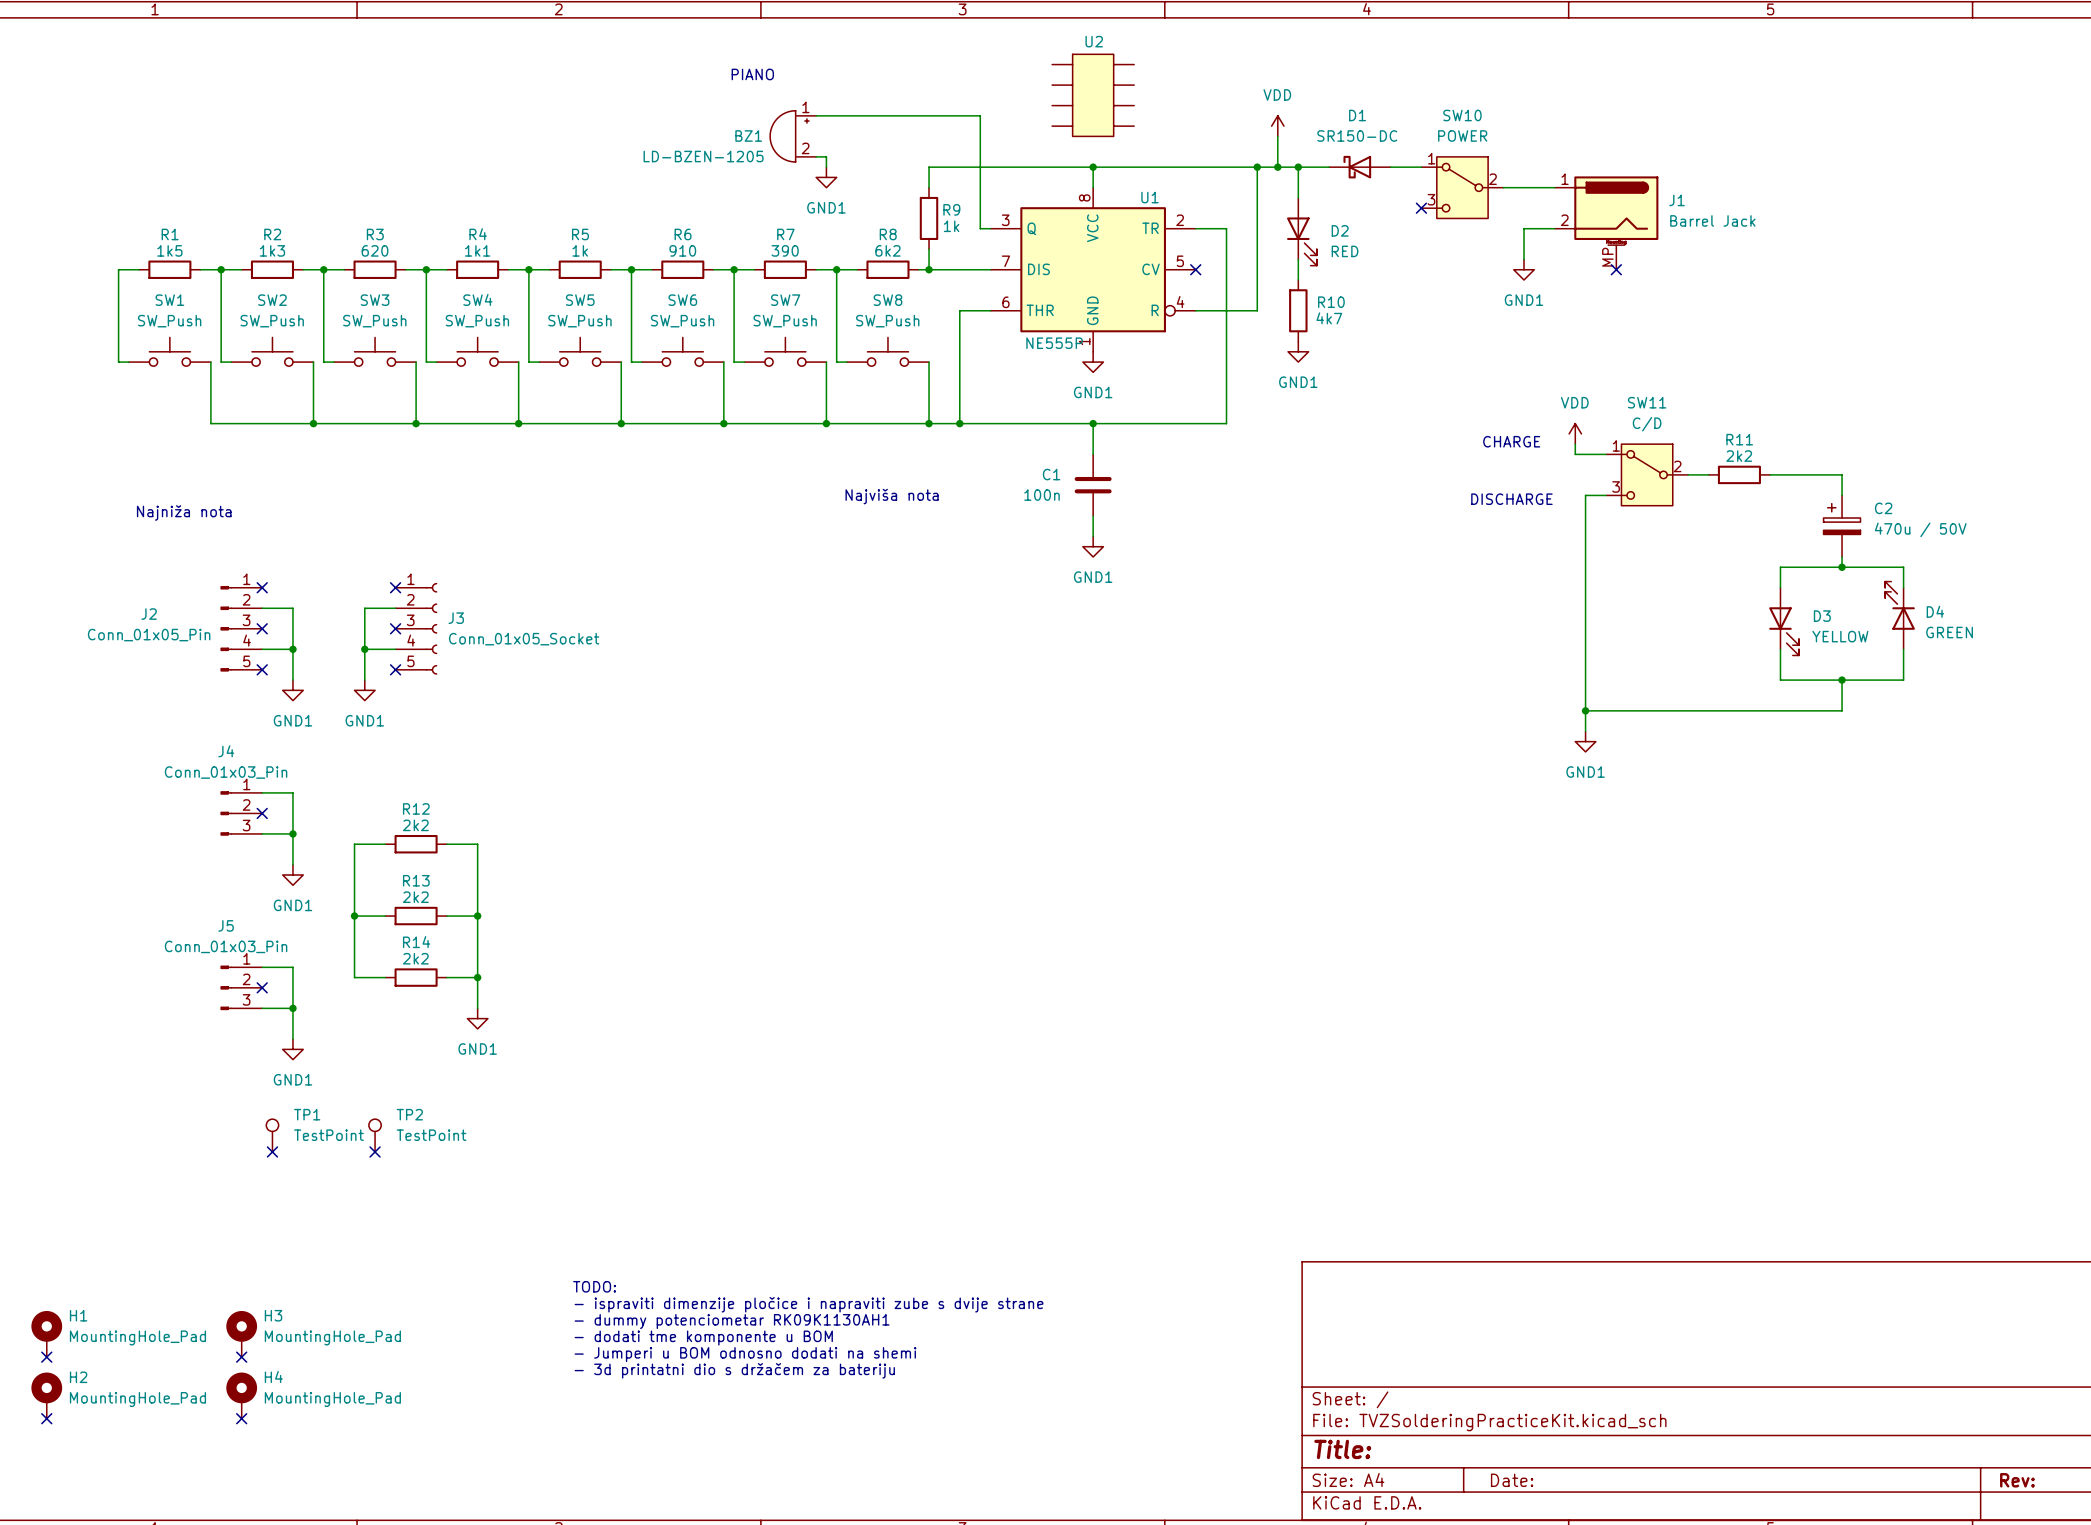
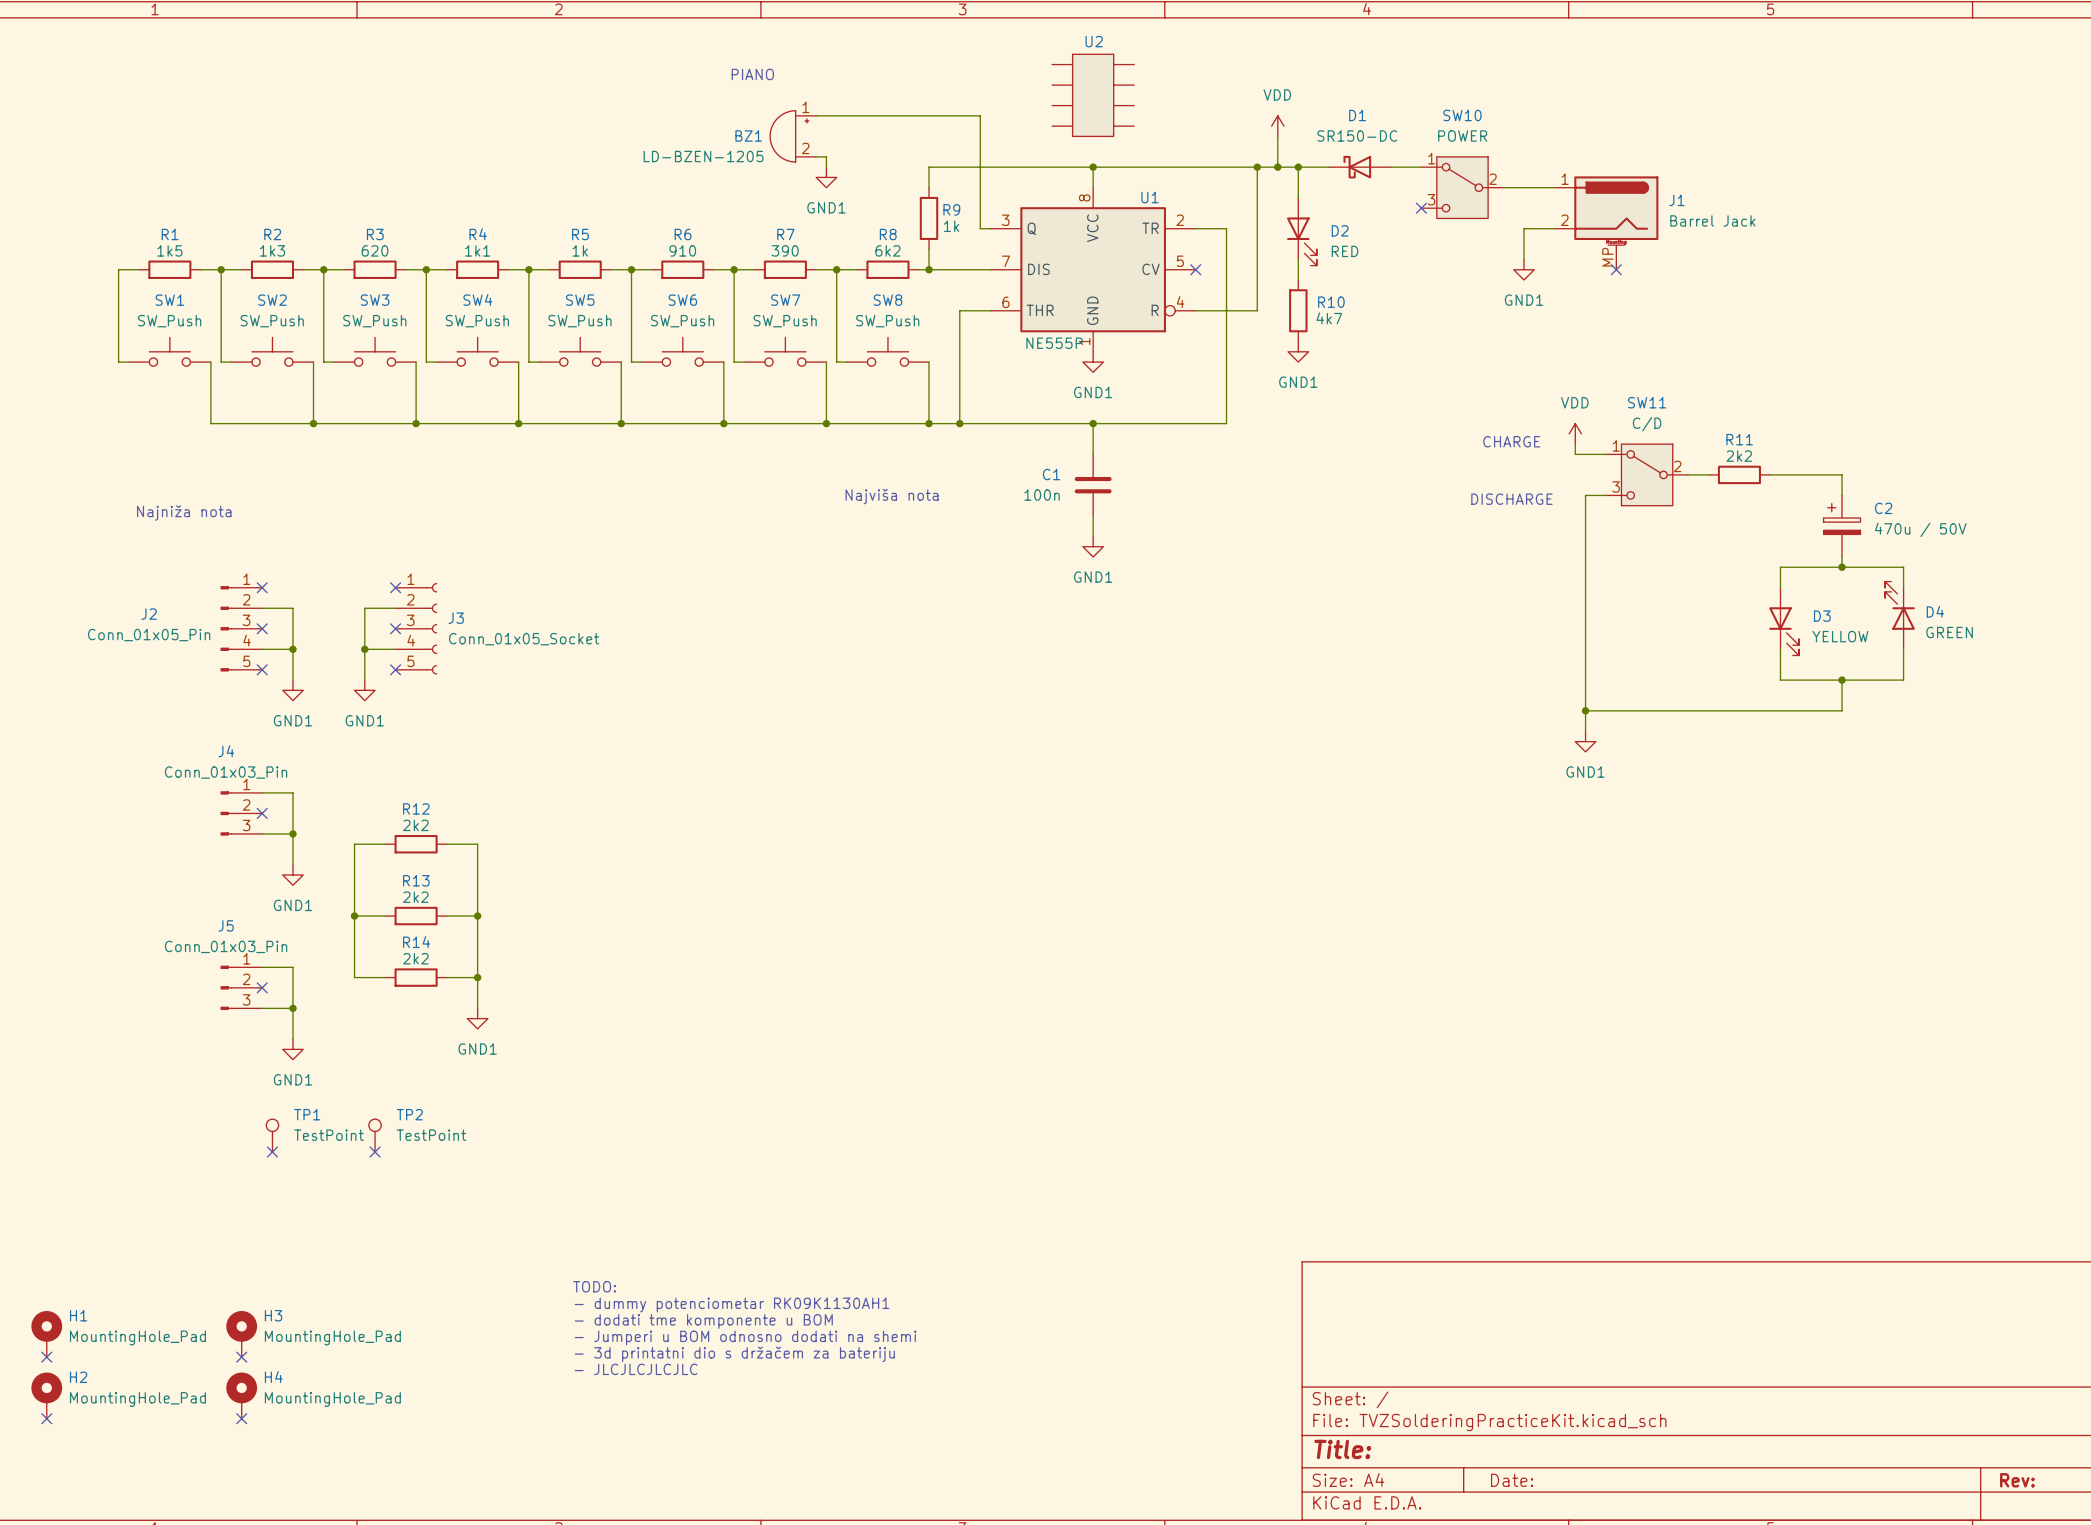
text: - ispraviti dimenzije pločice i napraviti zube s dvije strane (809, 1304) -> - dummy potenciometar RK09K1130AH1 (732, 1305)
text: - dummy potenciometar RK09K1130AH1 (732, 1321) -> - dodati tme komponente u BOM (703, 1321)
text: - dodati tme komponente u BOM (703, 1338) -> - Jumperi u BOM odnosno dodati na shemi (745, 1338)
text: - Jumperi u BOM odnosno dodati na shemi (745, 1354) -> - 3d printatni dio s držačem za bateriju (734, 1354)
text: - 3d printatni dio s držačem za bateriju (734, 1370) -> - JLCJLCJLCJLC (636, 1369)

